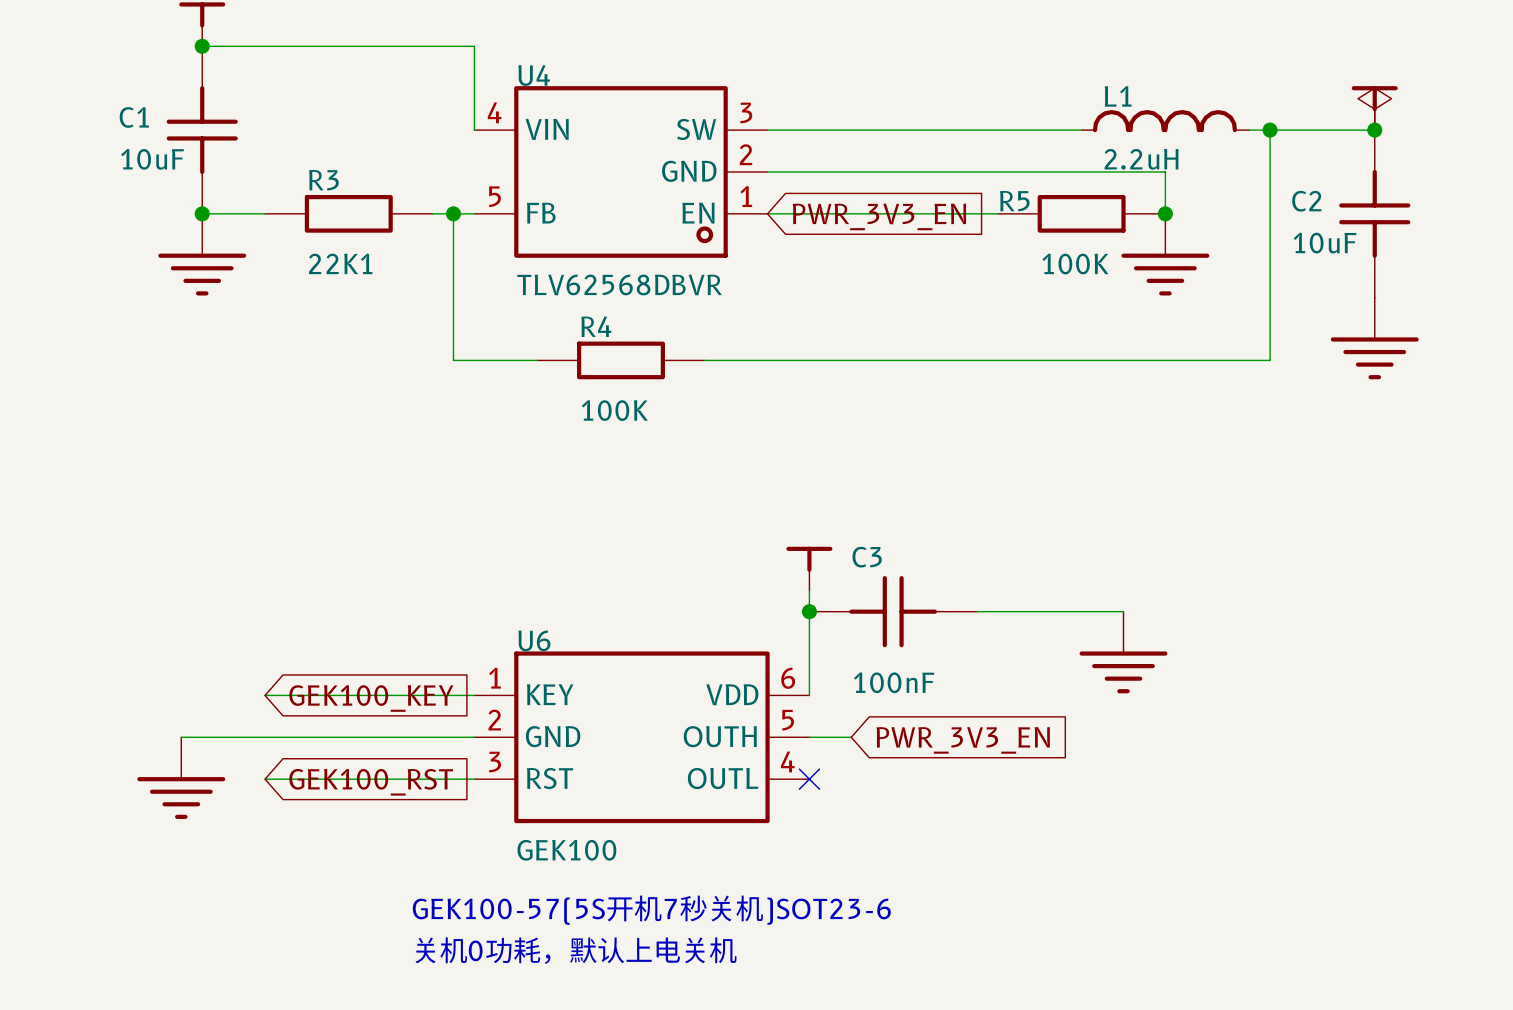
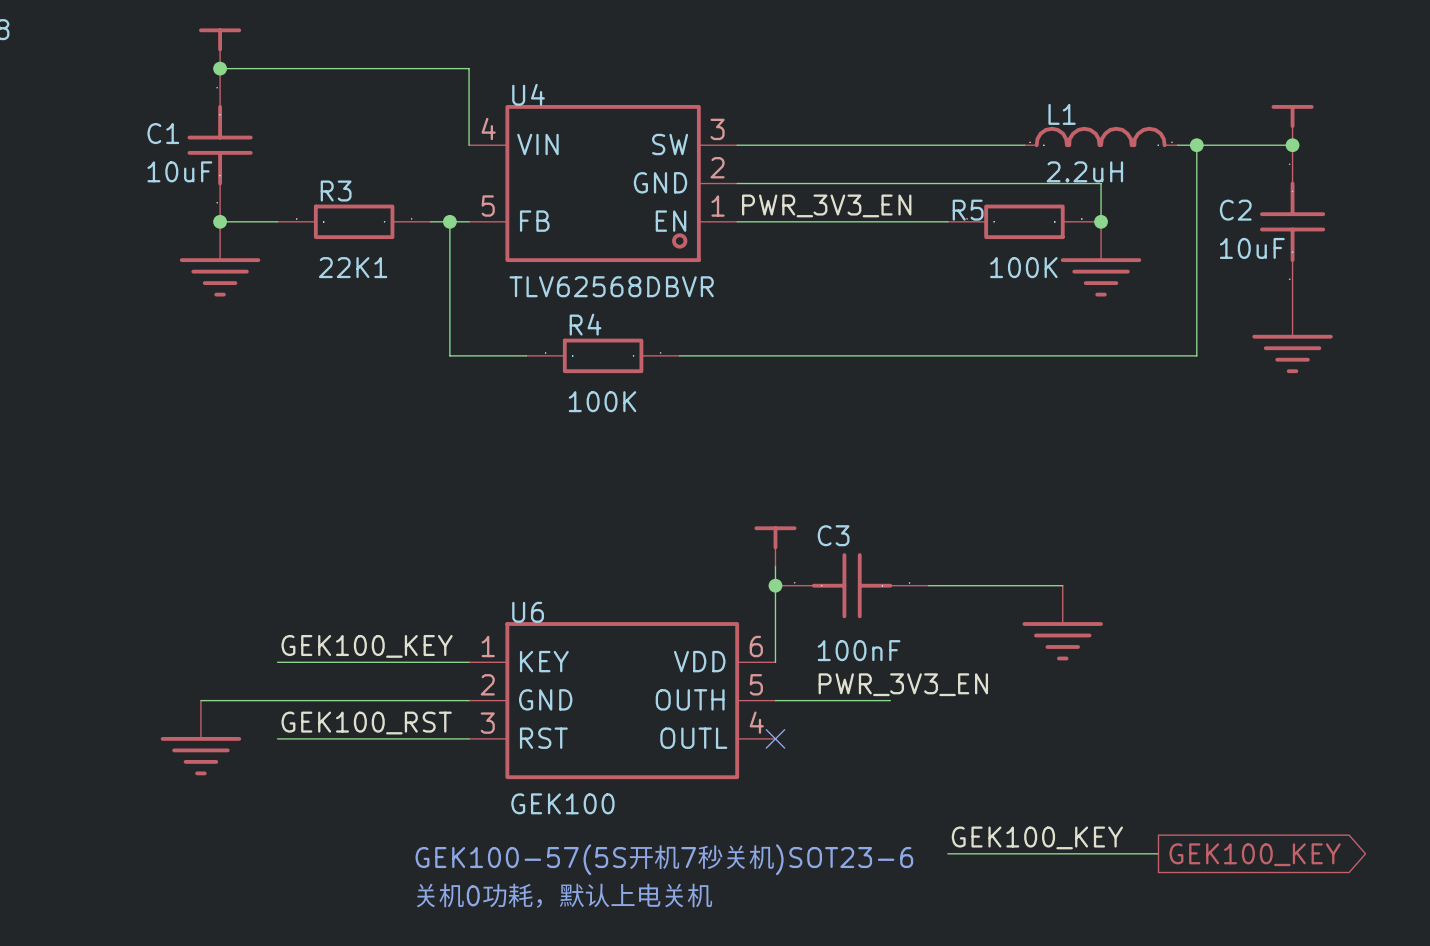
power symbol: (1374, 109) -> none
label: none -> PWR_3V3_EN (826, 205)
global label: PWR_3V3_EN (879, 216) -> none
label: none -> GEK100_KEY (367, 646)
global label: GEK100_KEY (371, 698) -> none
label: none -> PWR_3V3_EN (903, 684)
wire: none -> (813, 700) (890, 700)
global label: PWR_3V3_EN (963, 740) -> none
label: none -> GEK100_RST (366, 723)
global label: GEK100_RST (371, 782) -> none
label: none -> GEK100_KEY (1037, 837)
wire: none -> (947, 853) (1158, 853)
global label: none -> GEK100_KEY (1255, 854)

